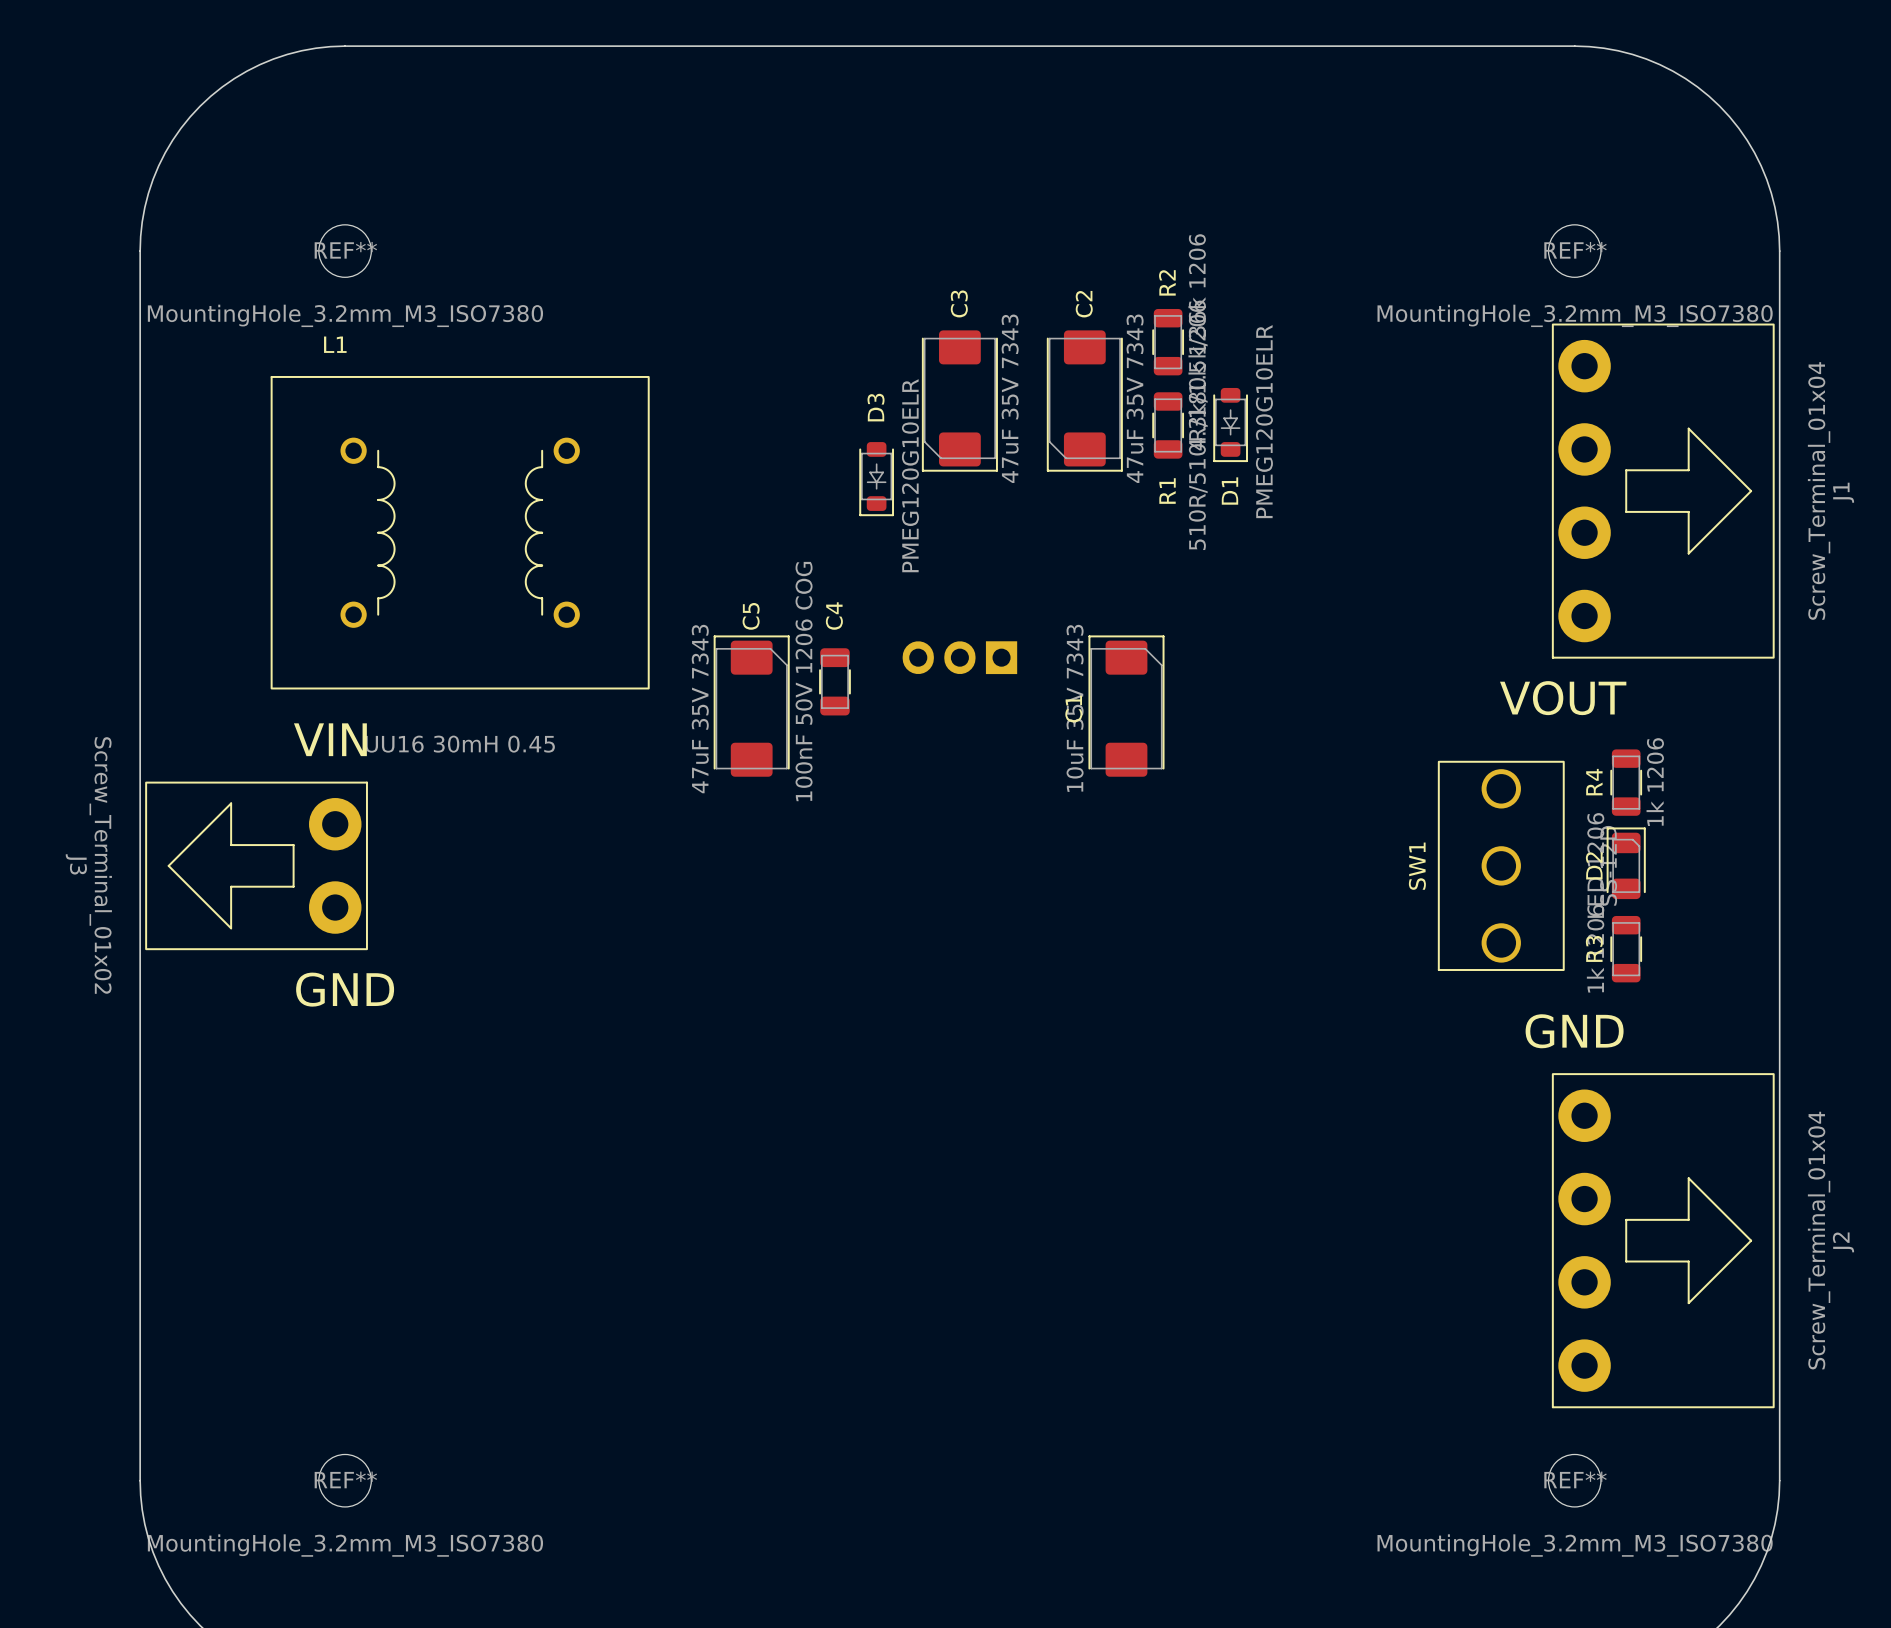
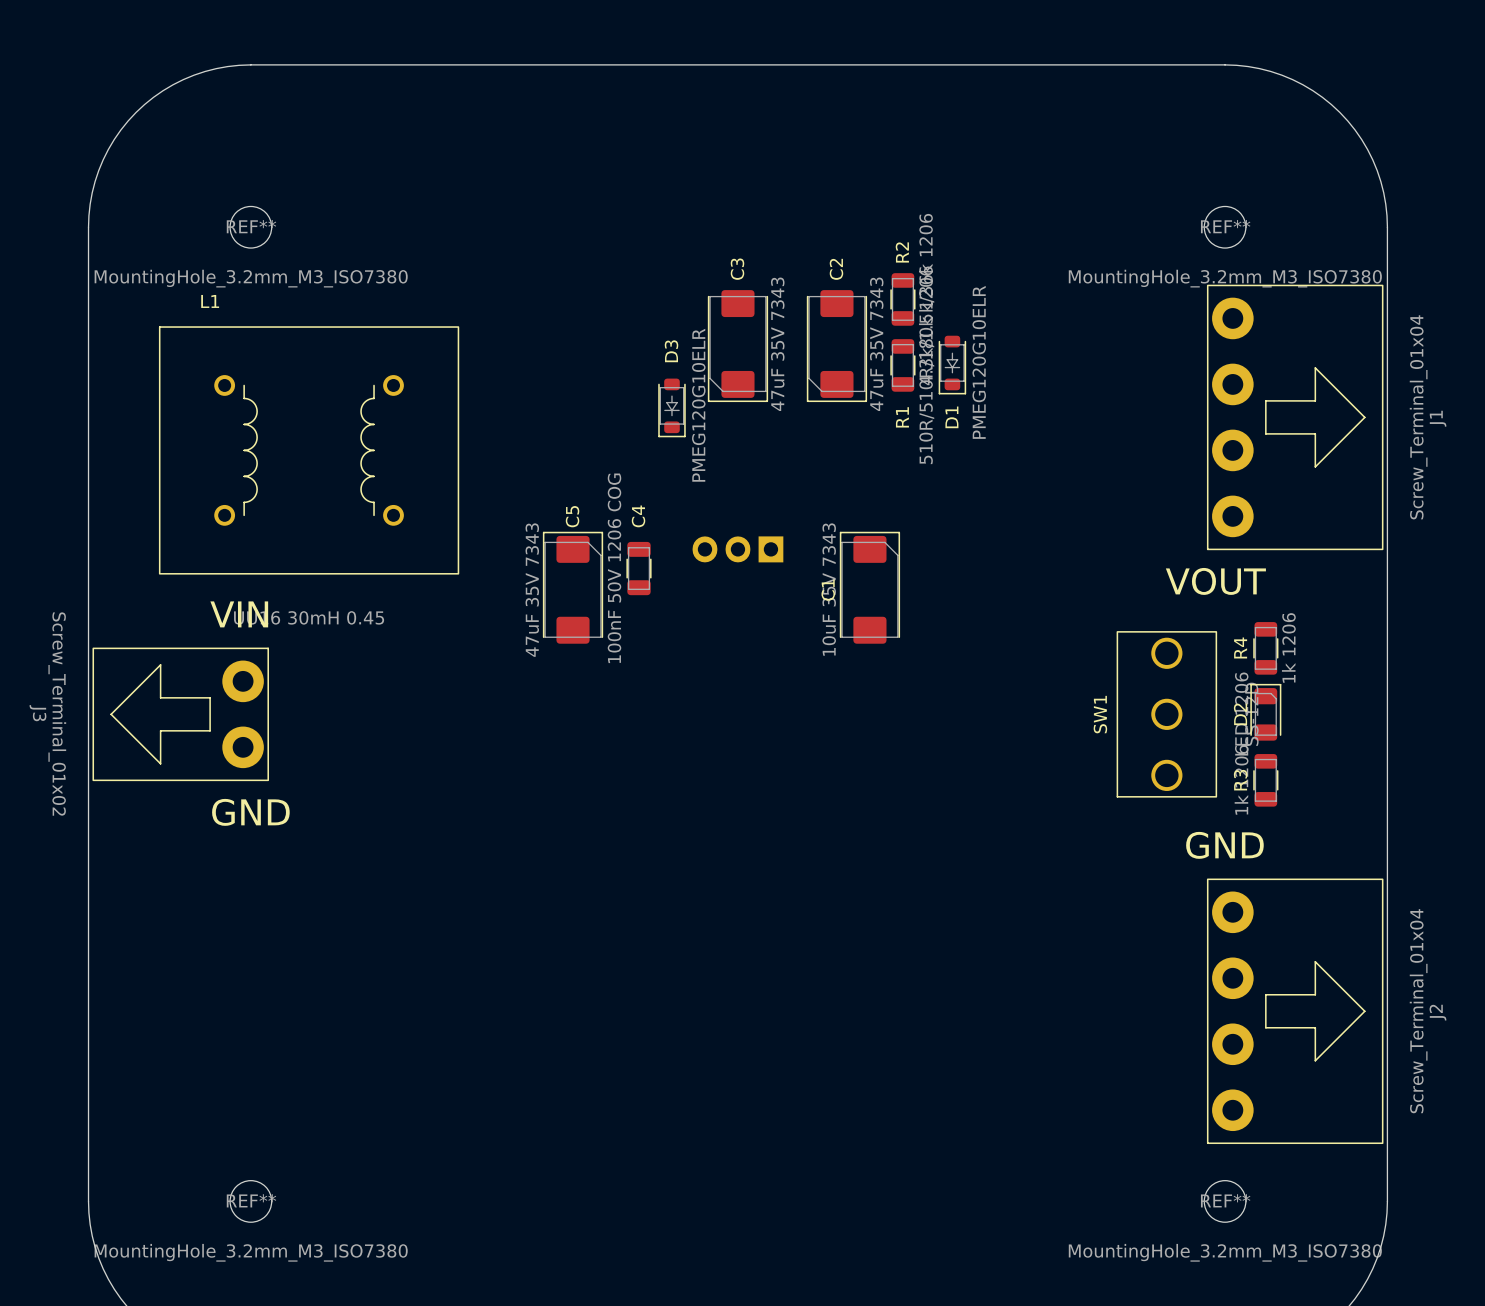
L1 position: (460, 532) -> (309, 450)

